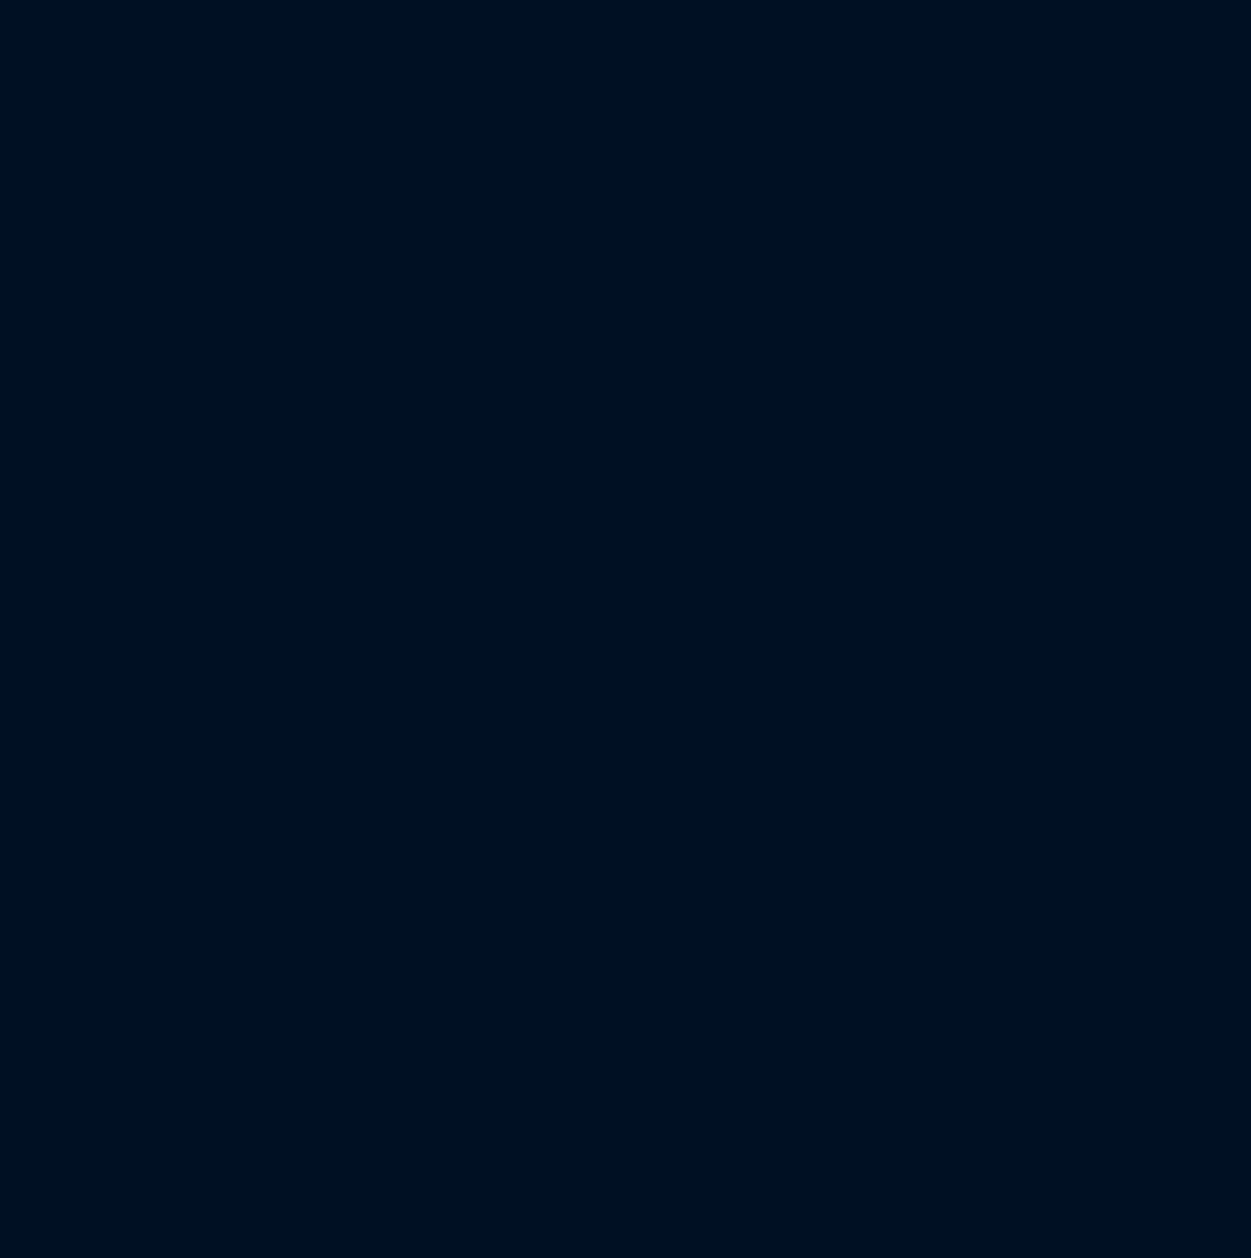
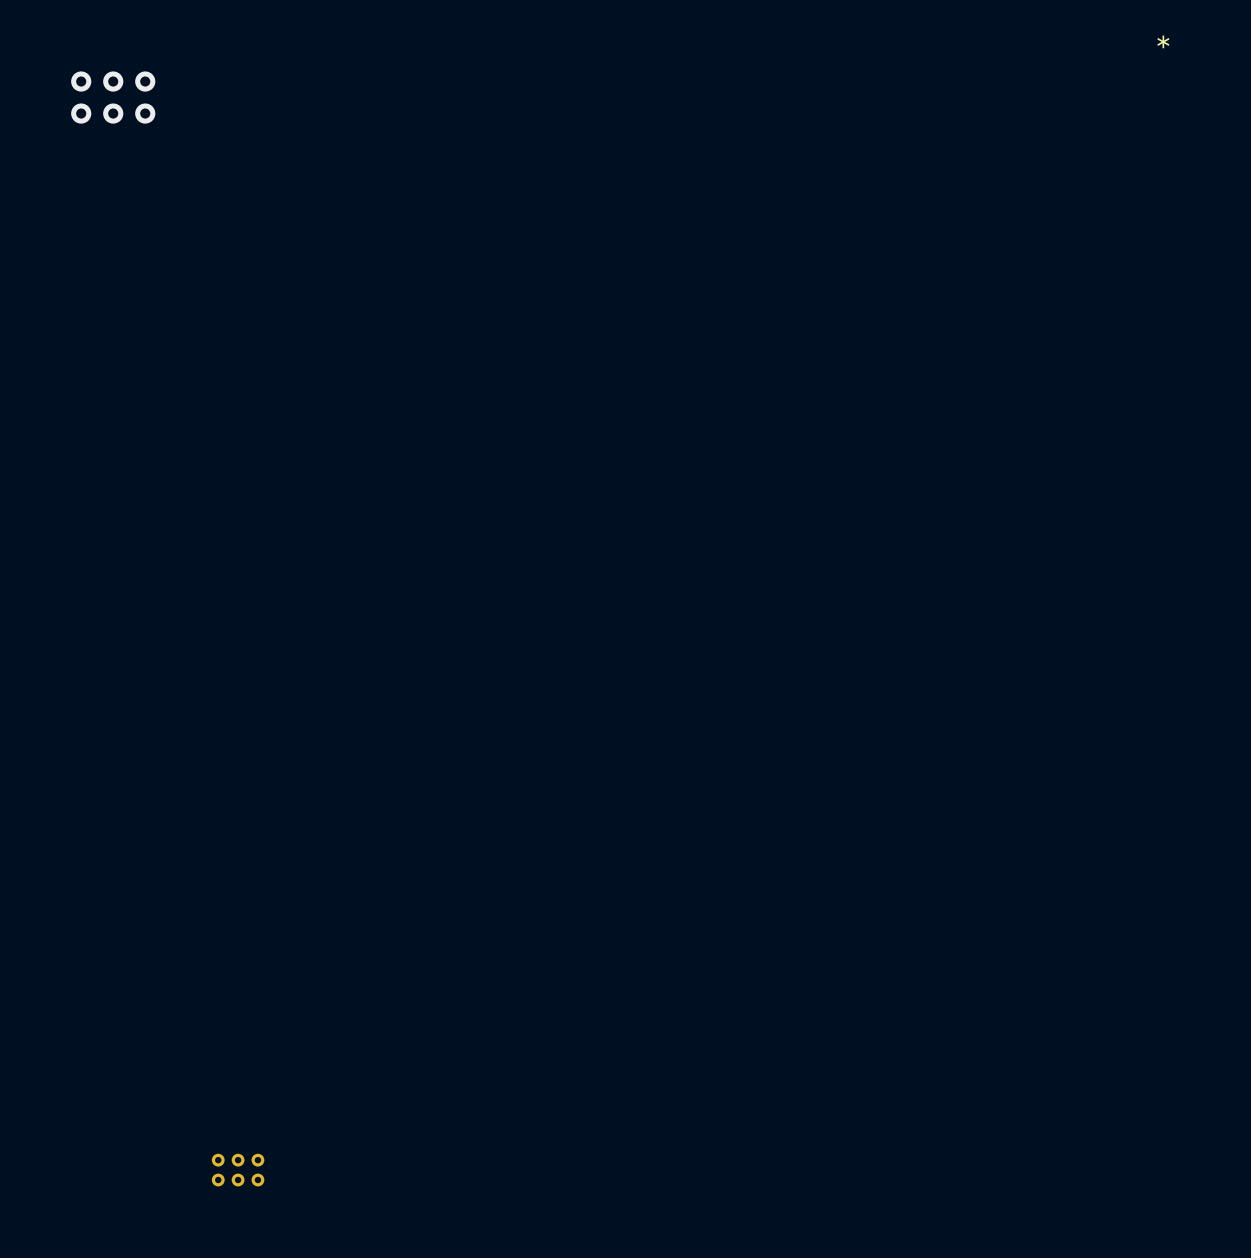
part: none -> (1163, 41)
via: none -> (81, 81)
via: none -> (113, 81)
via: none -> (145, 81)
via: none -> (81, 113)
via: none -> (113, 113)
via: none -> (145, 113)
part: none -> (238, 1170)

